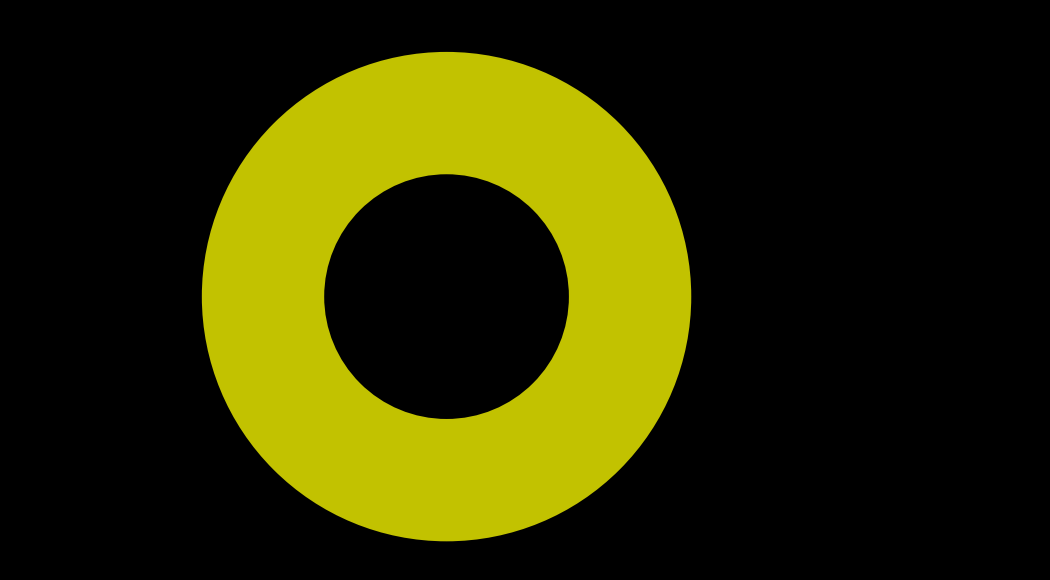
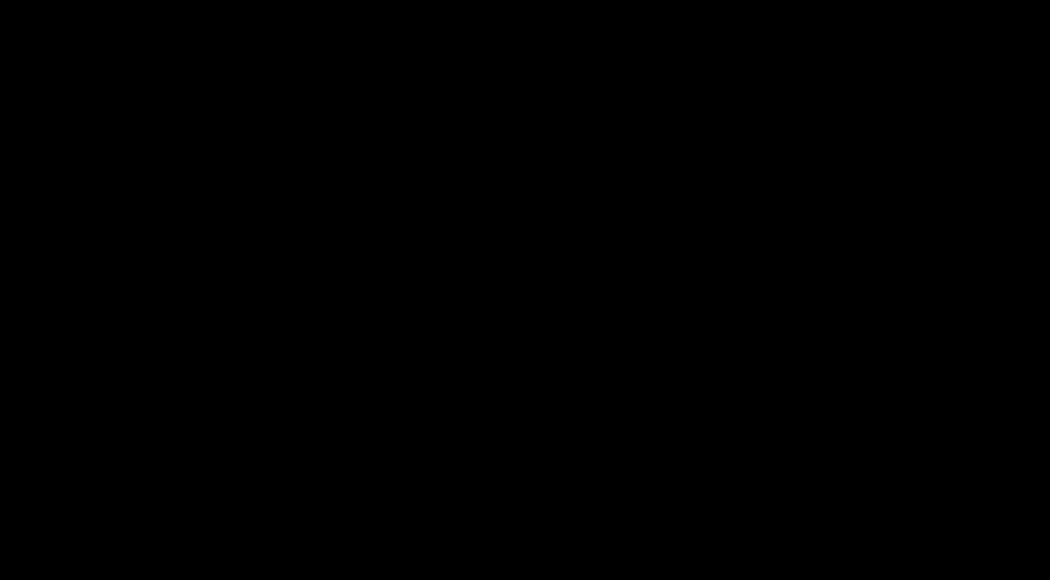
part: (446, 296) -> none

